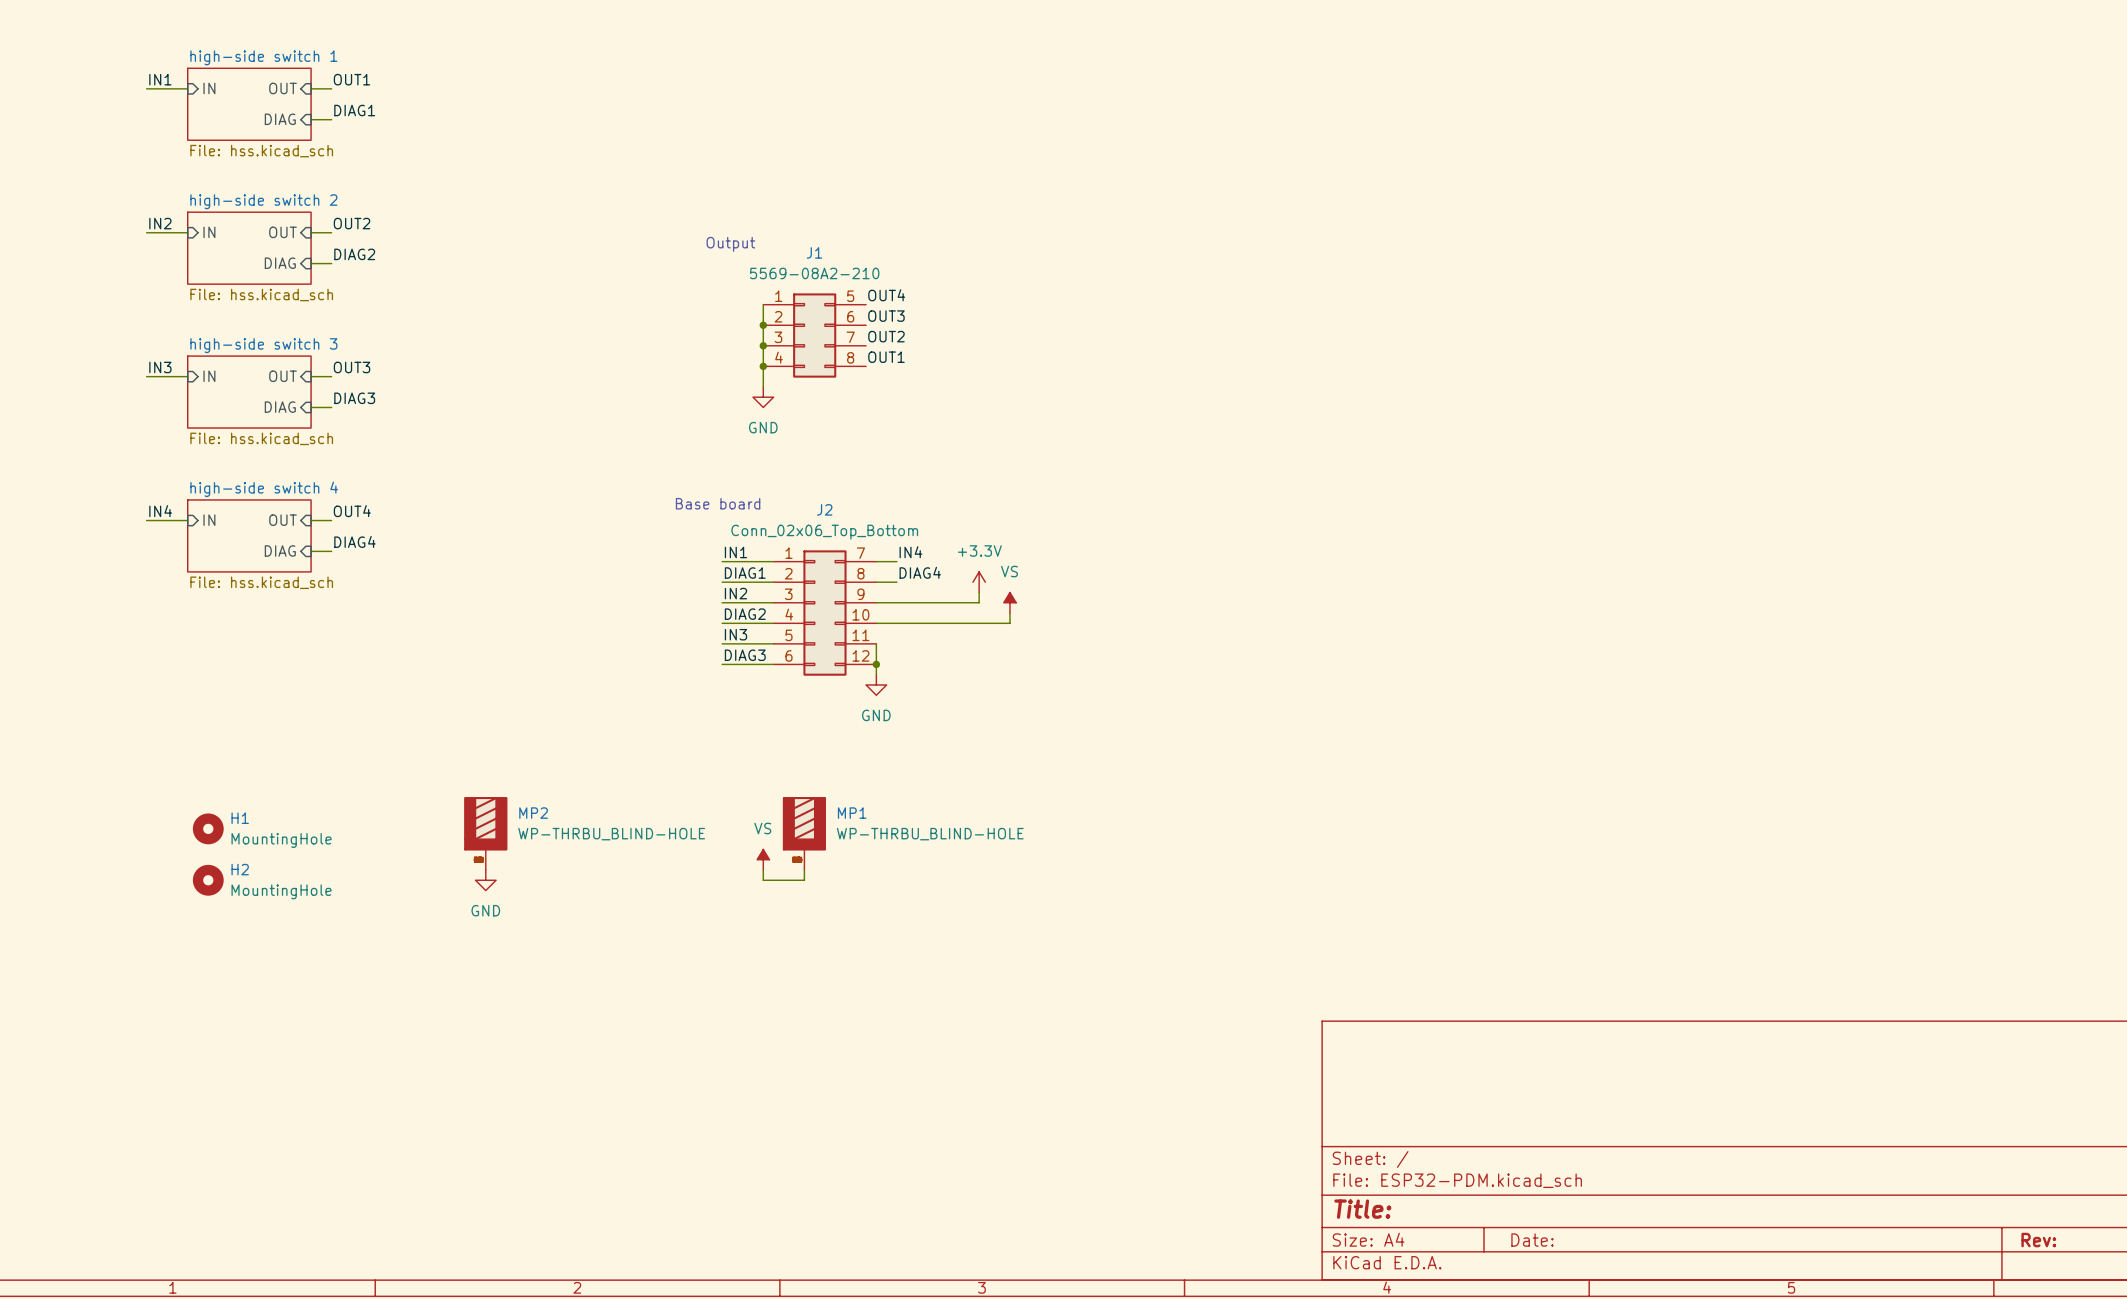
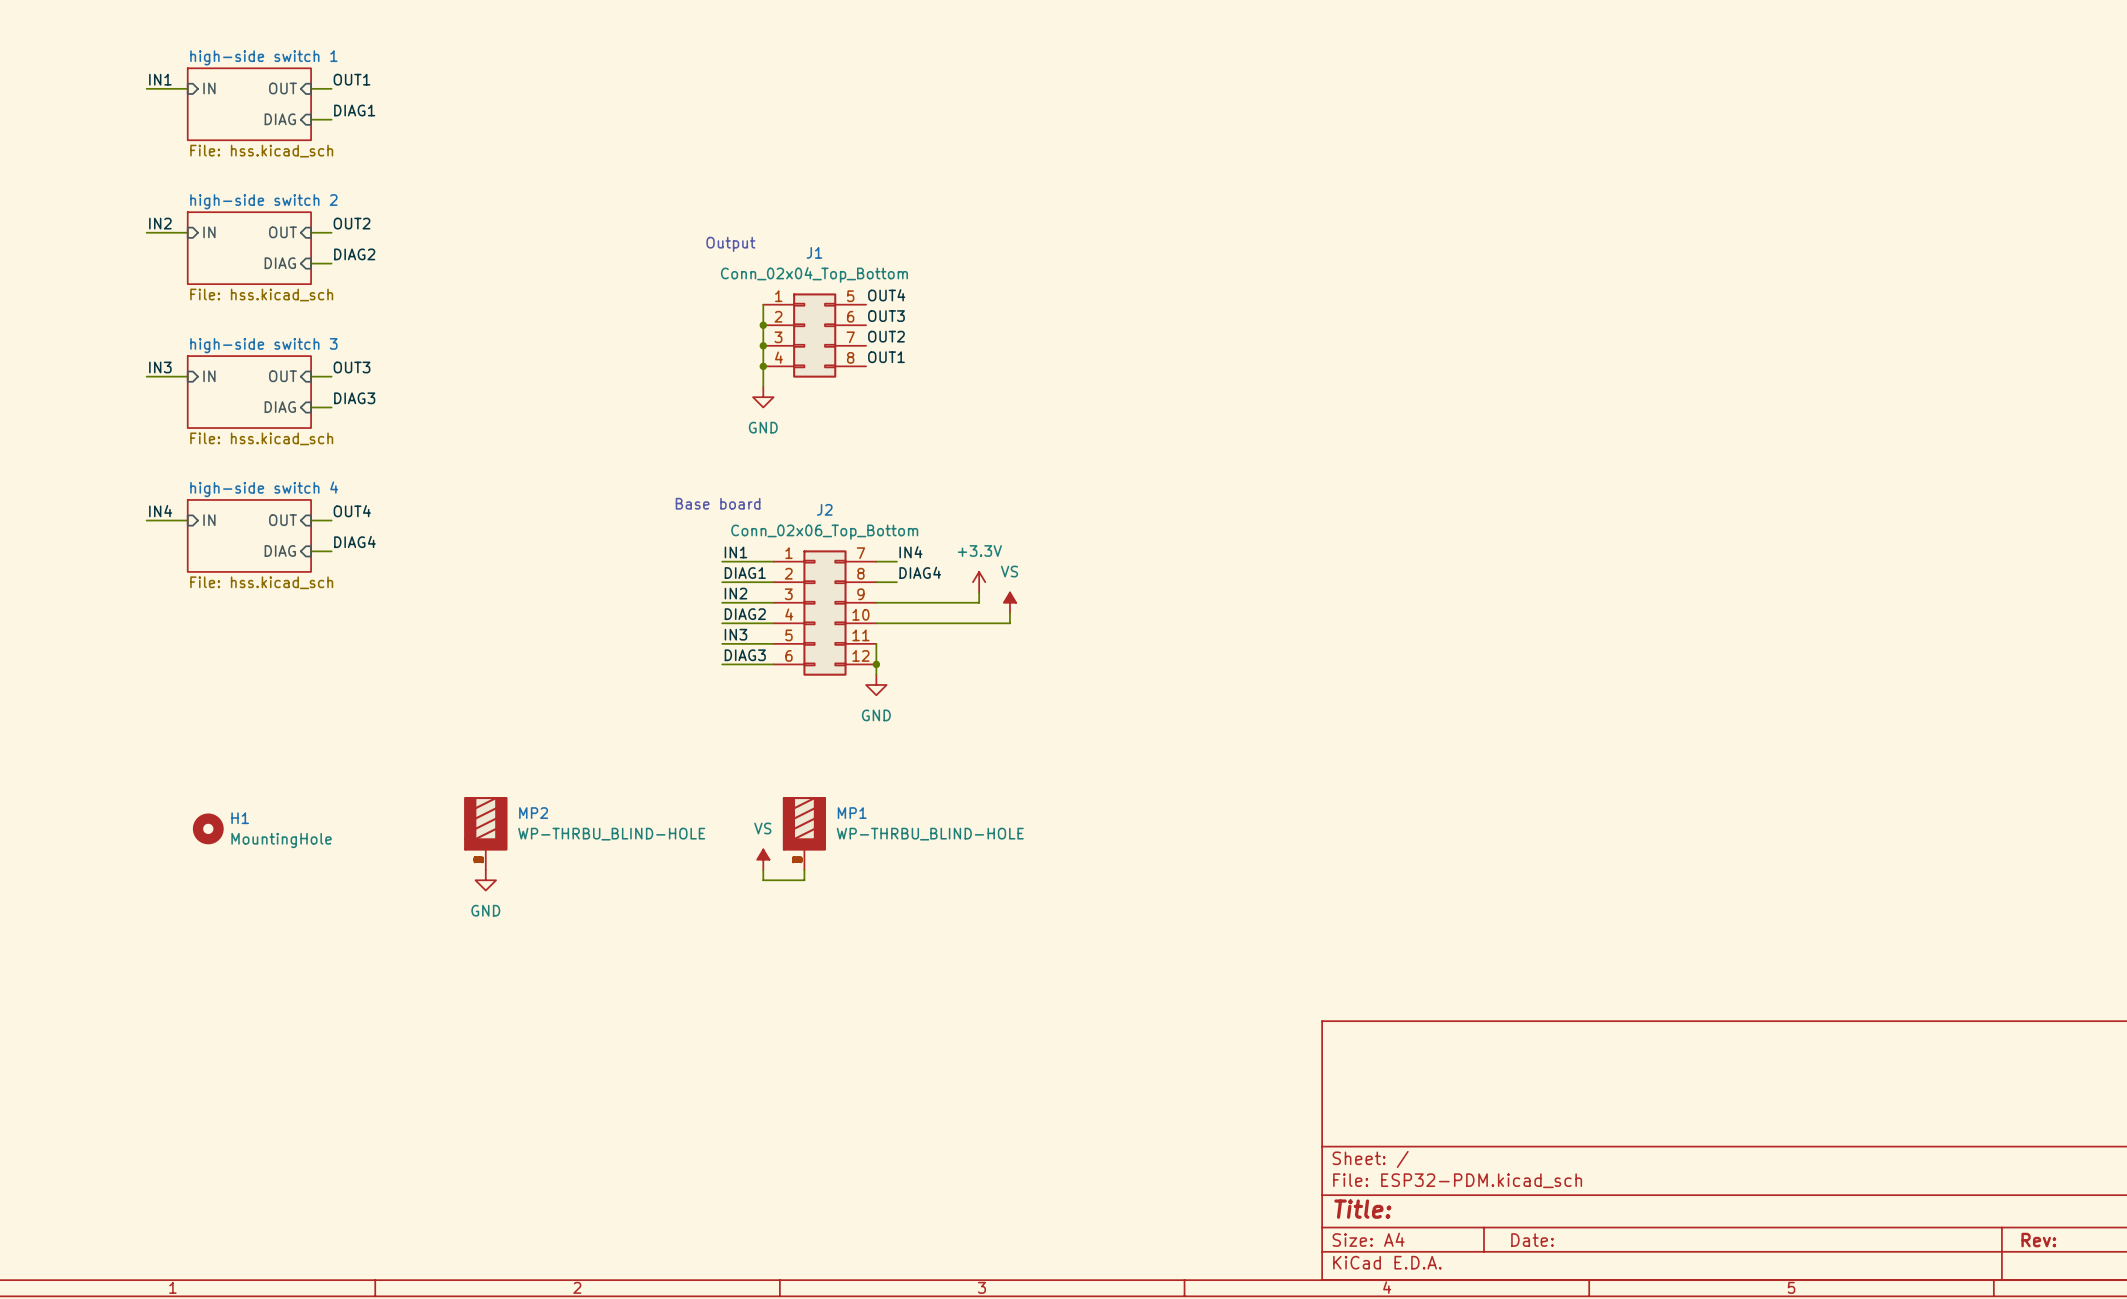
J1 value: 5569-08A2-210 (814, 273) -> Conn_02x04_Top_Bottom (814, 274)
H2: MountingHole (208, 880) -> none

